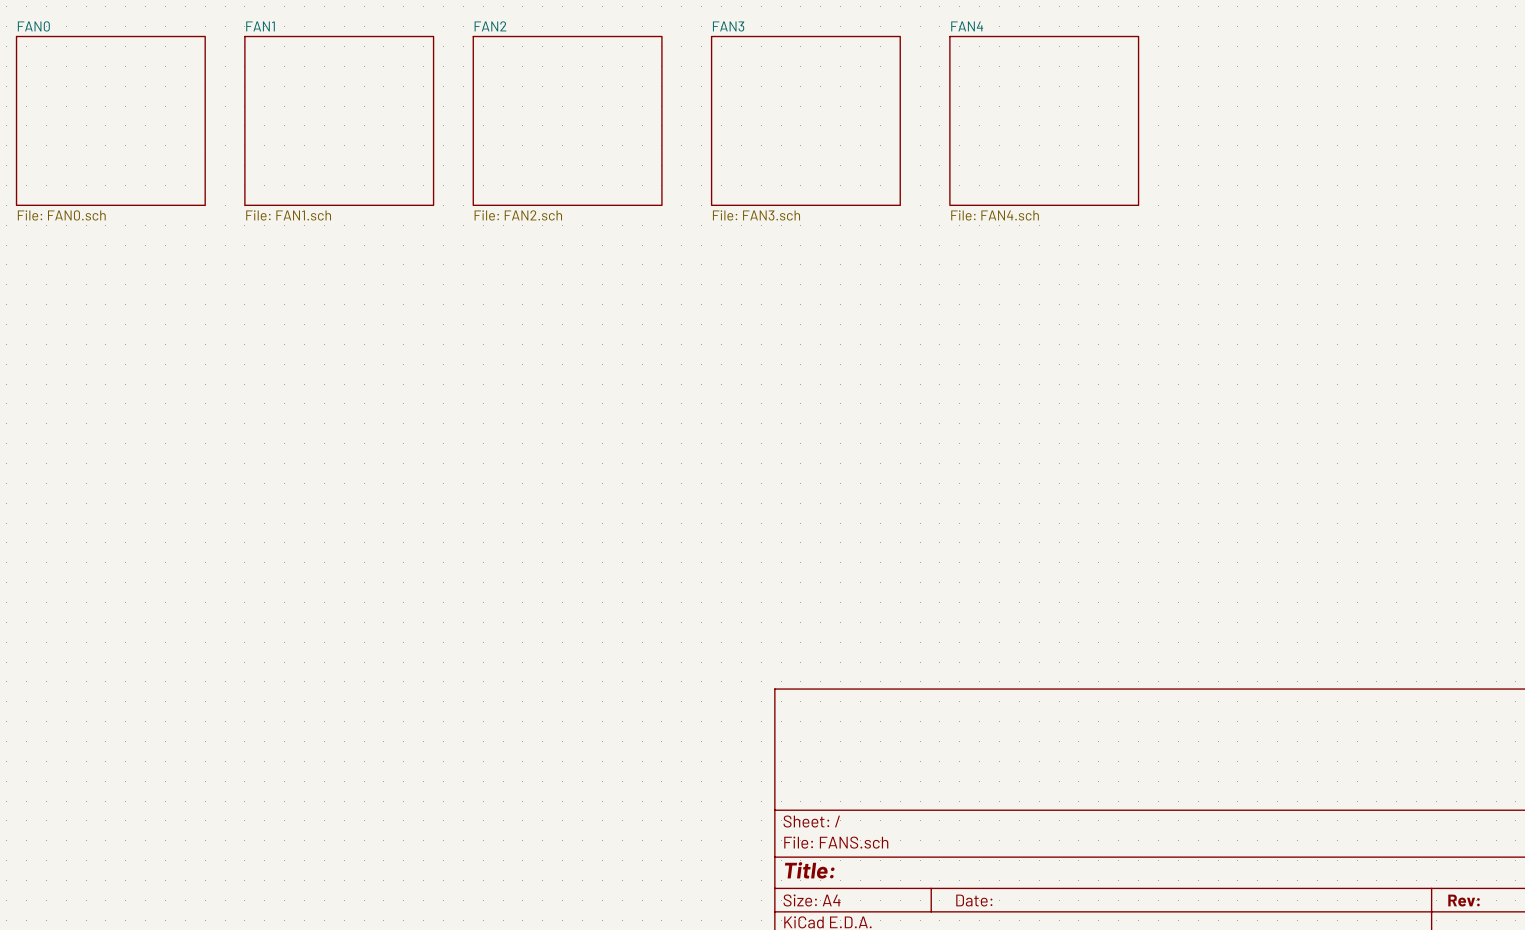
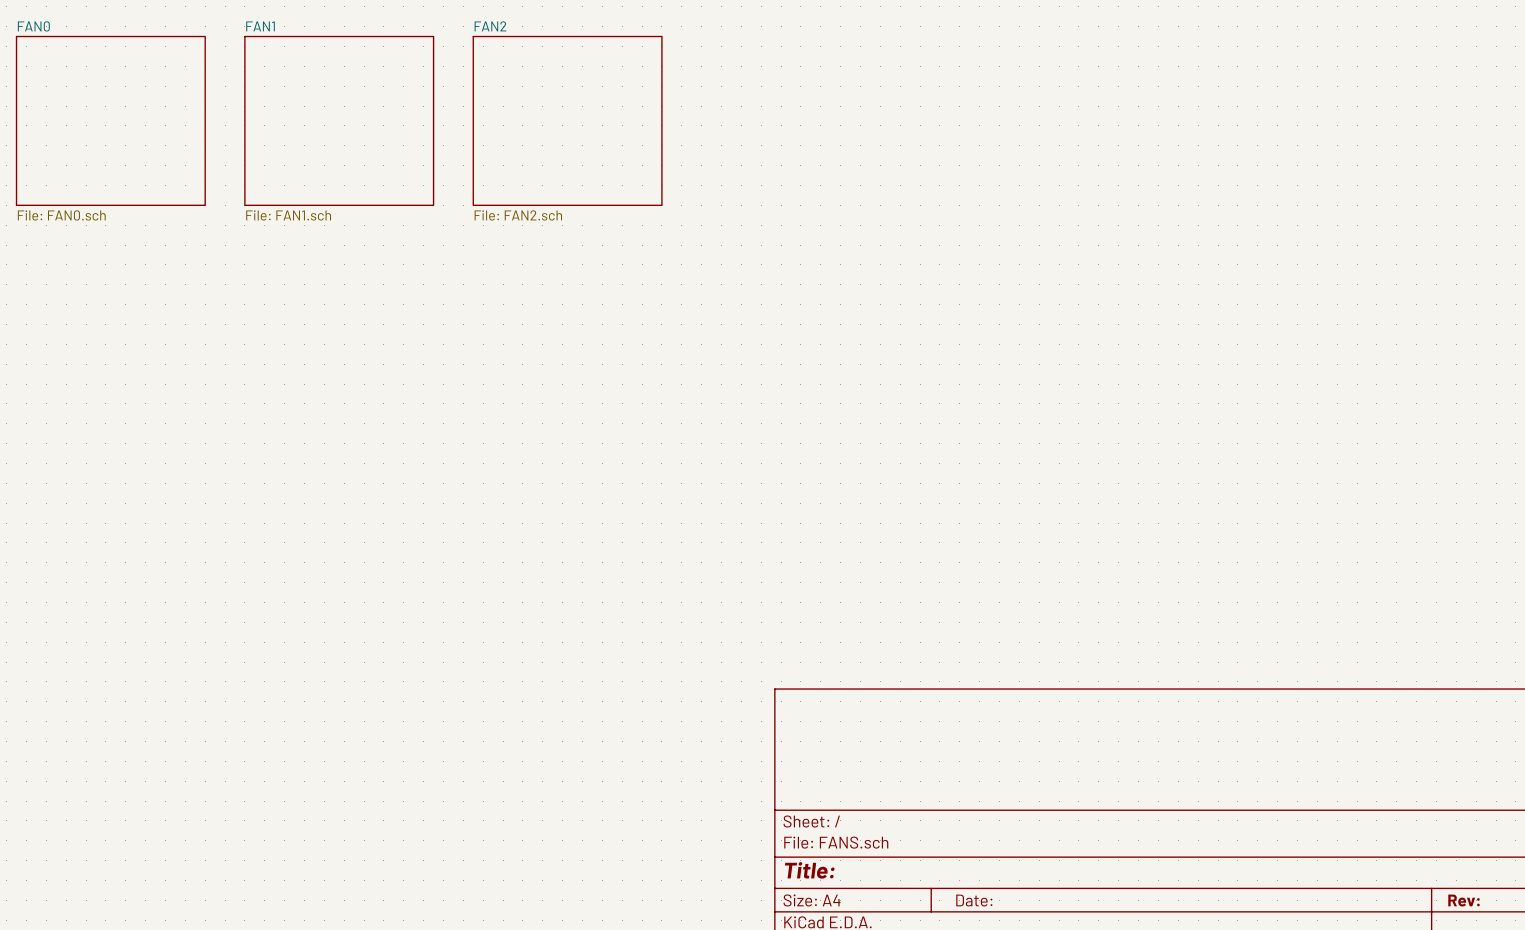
sheet FAN3: File: FAN3.sch (805, 120) -> none
sheet FAN4: File: FAN4.sch (1044, 120) -> none

